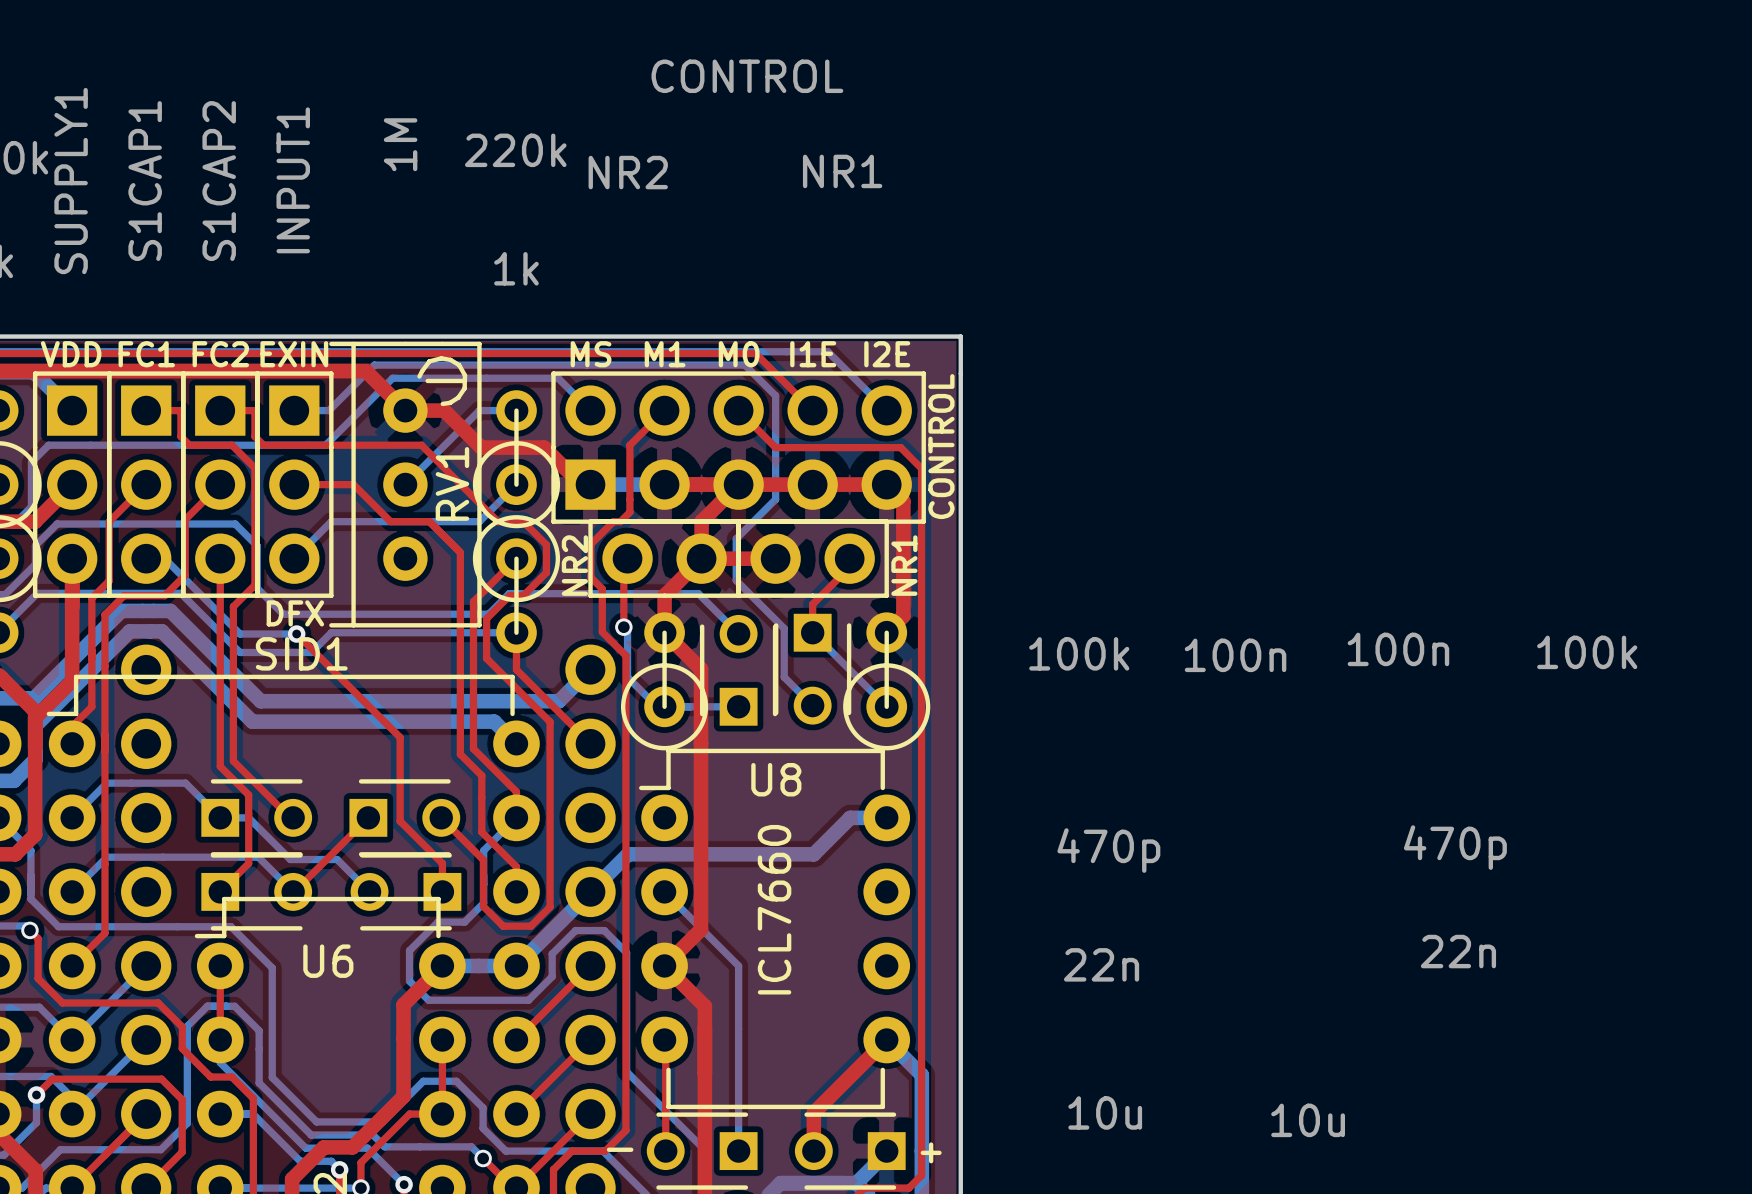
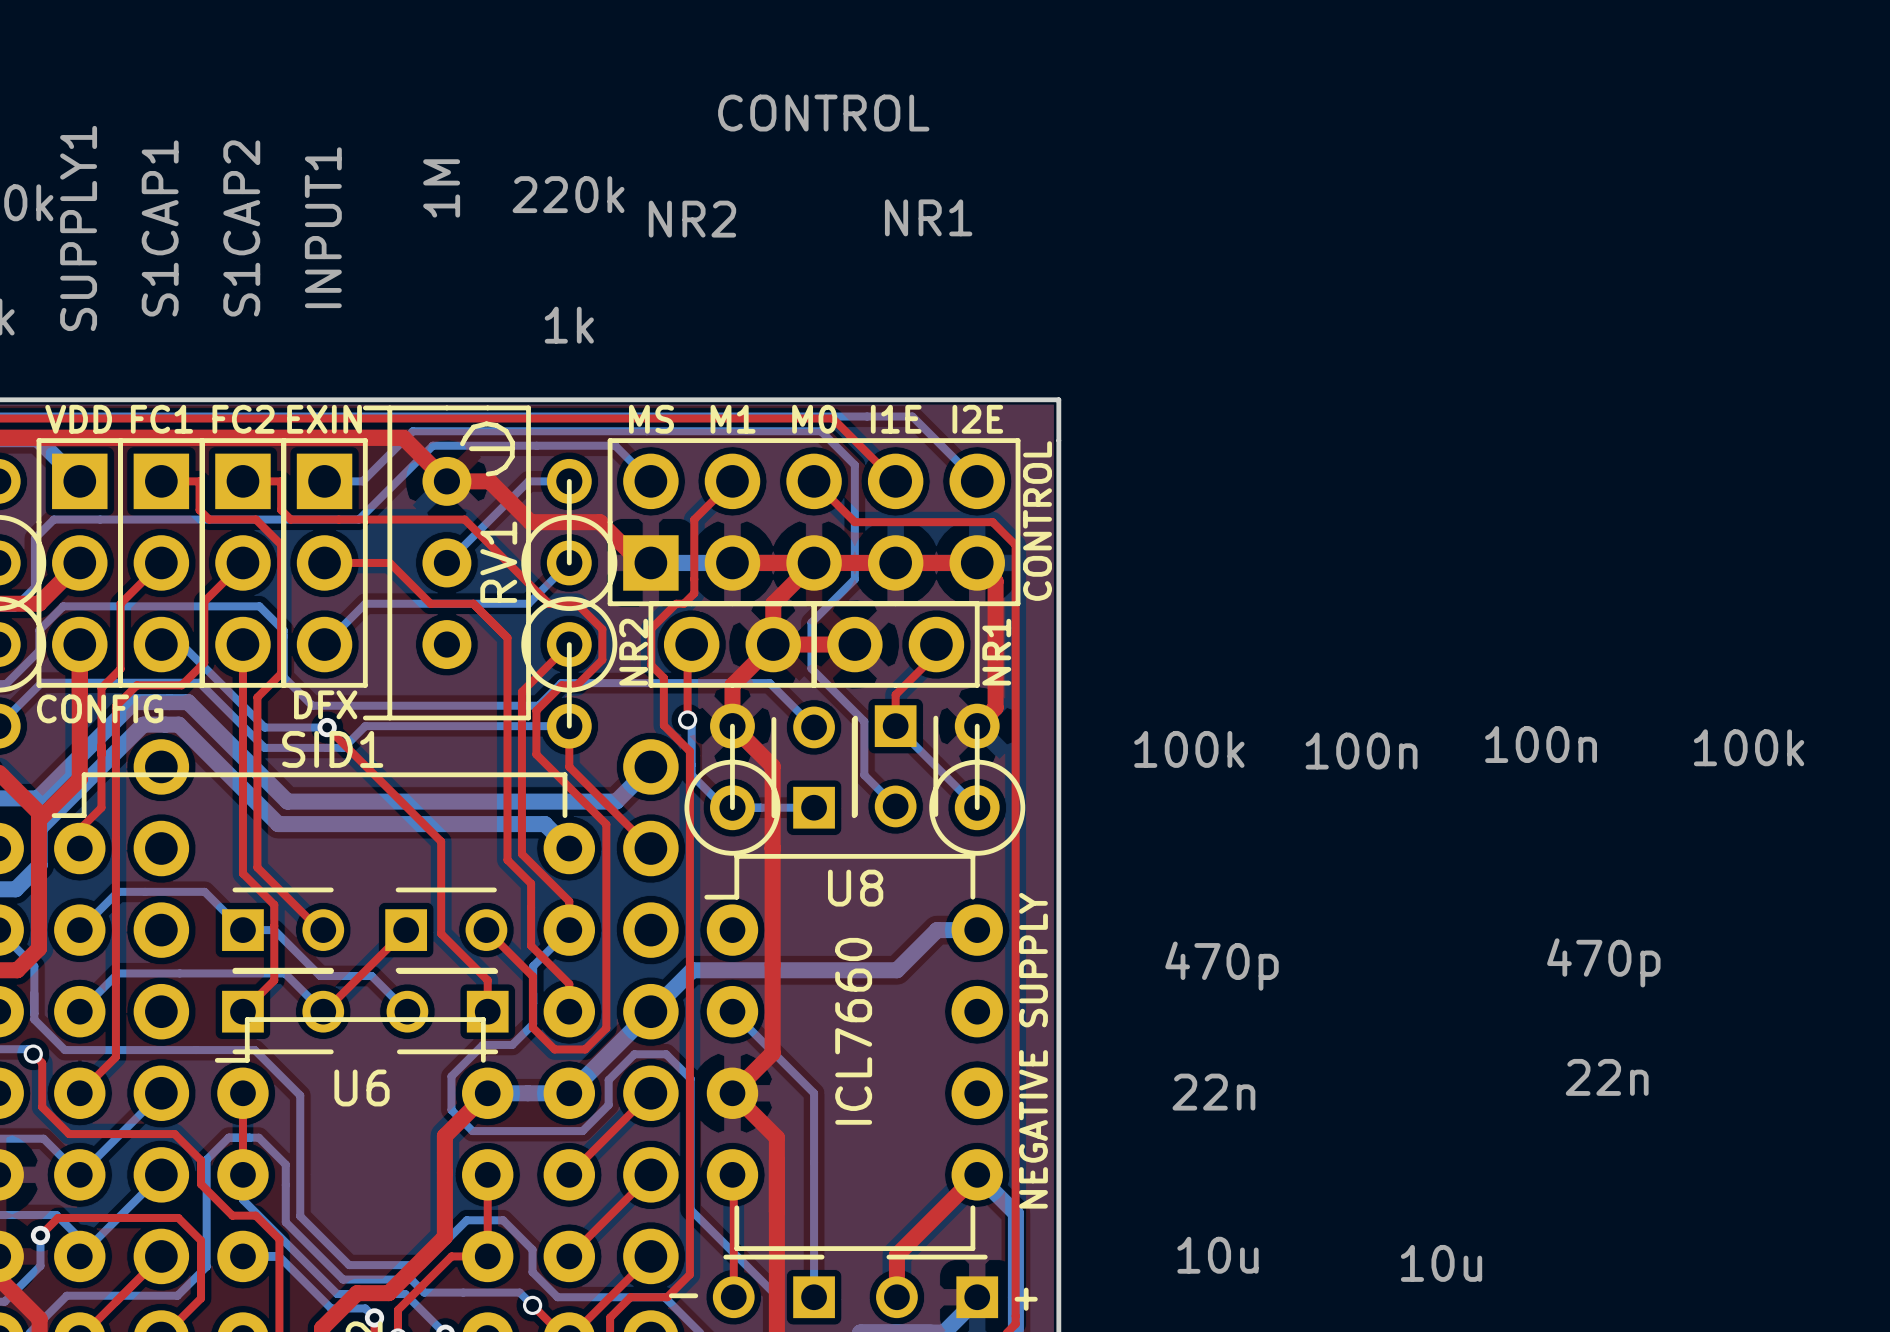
text: none -> CONFIG (100, 708)
text: none -> NEGATIVE SUPPLY (1033, 1050)

